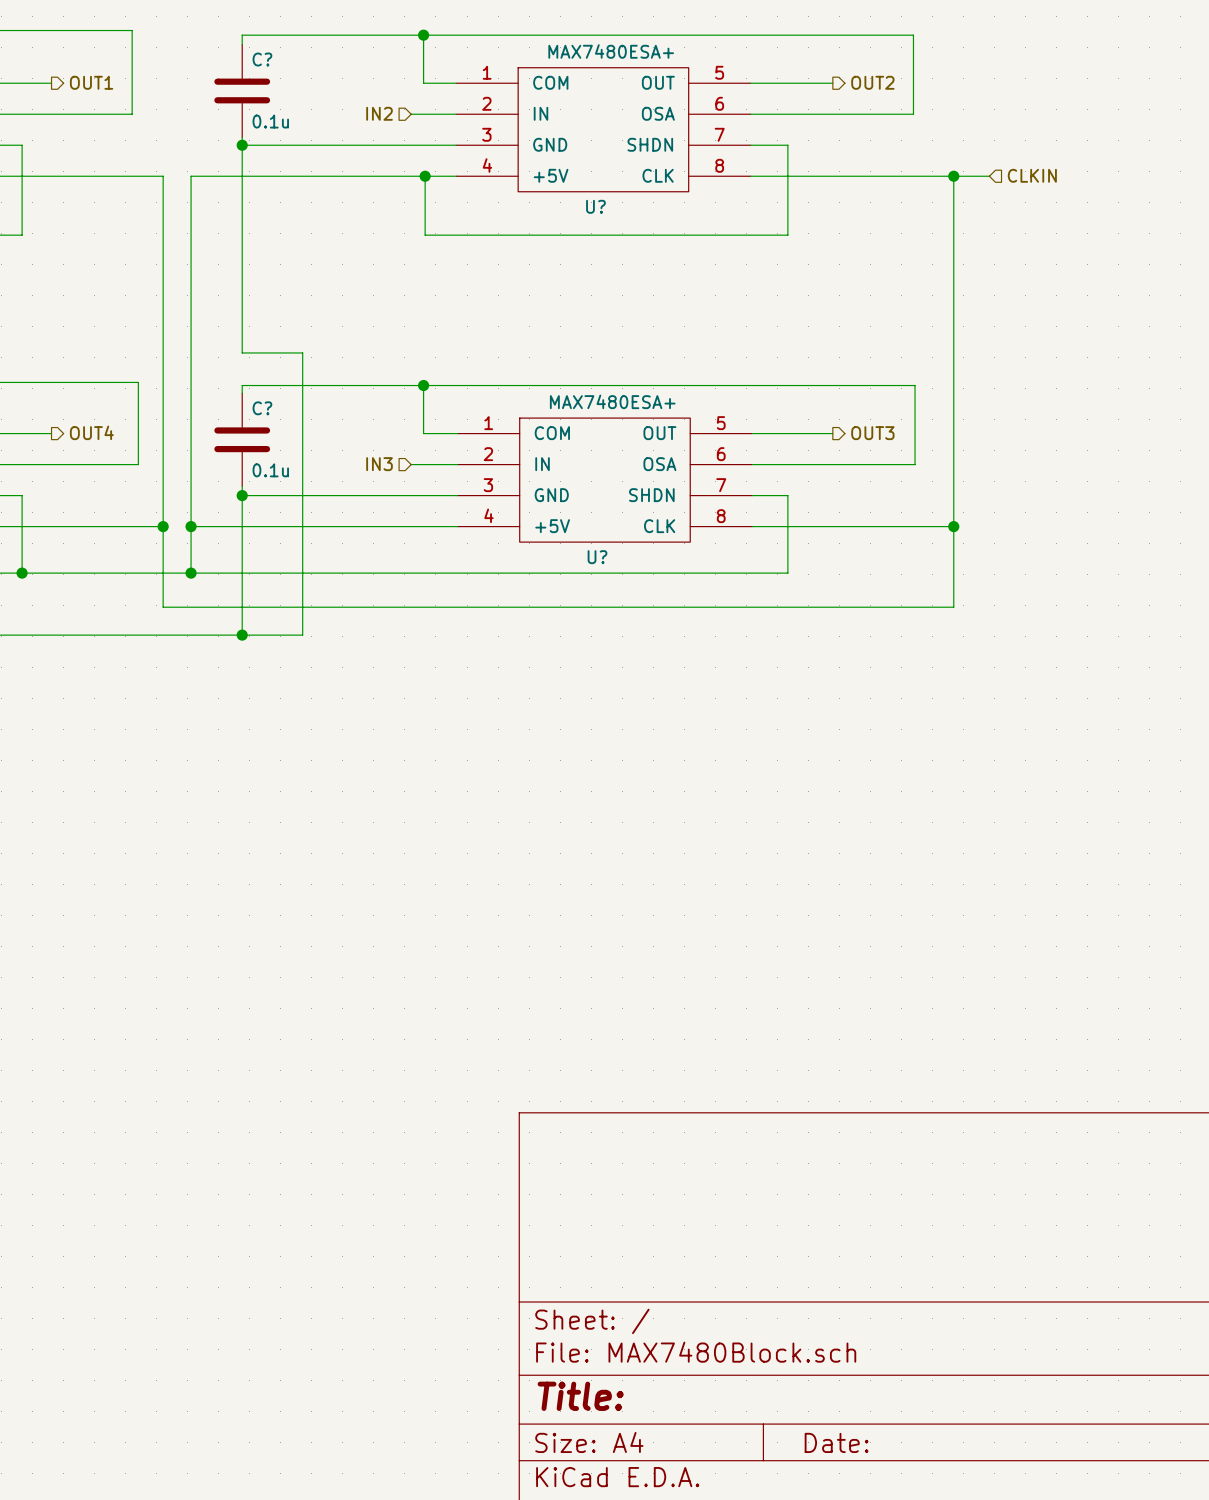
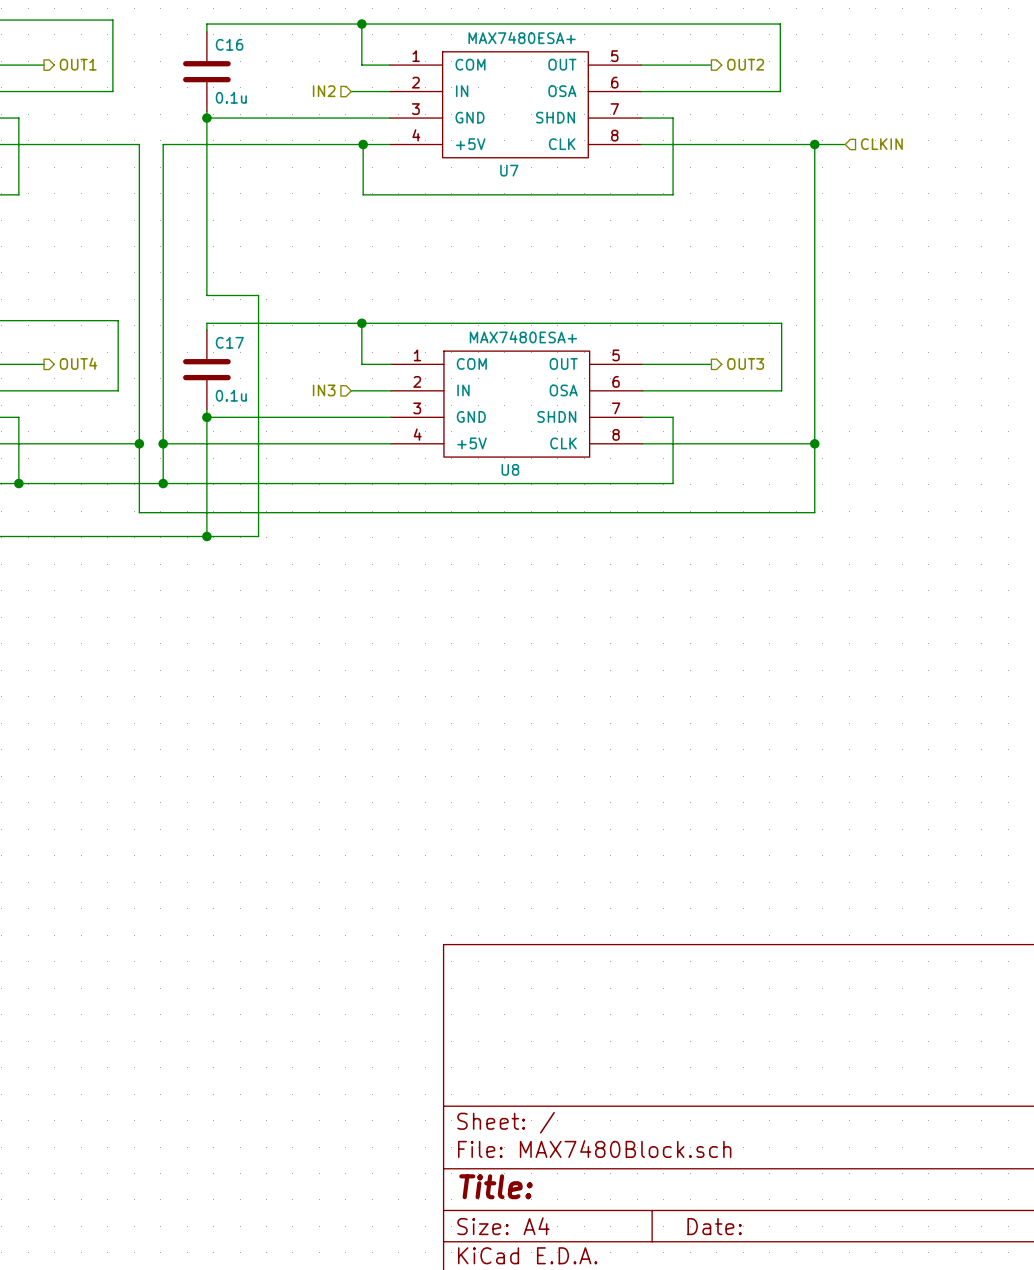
C? name: C? (262, 59) -> C16 (229, 44)
U? name: U? (595, 206) -> U7 (509, 170)
C? name: C? (262, 408) -> C17 (229, 342)
U? name: U? (597, 557) -> U8 (510, 469)

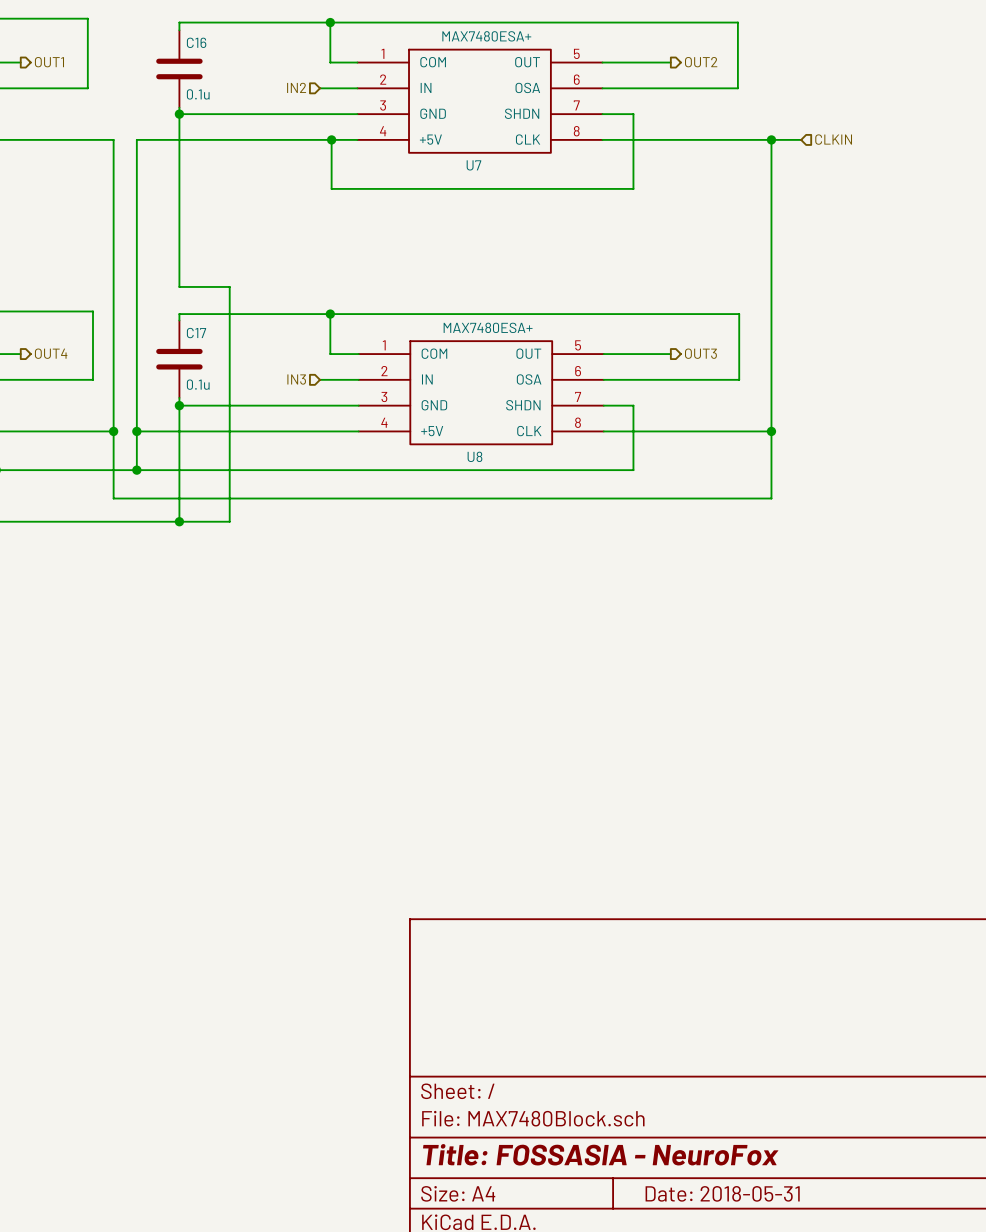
title block: Title: (496, 1186) -> Title: FOSSASIA - NeuroFox (600, 1154)
title block: Date: (714, 1226) -> Date: 2018-05-31 (722, 1193)

